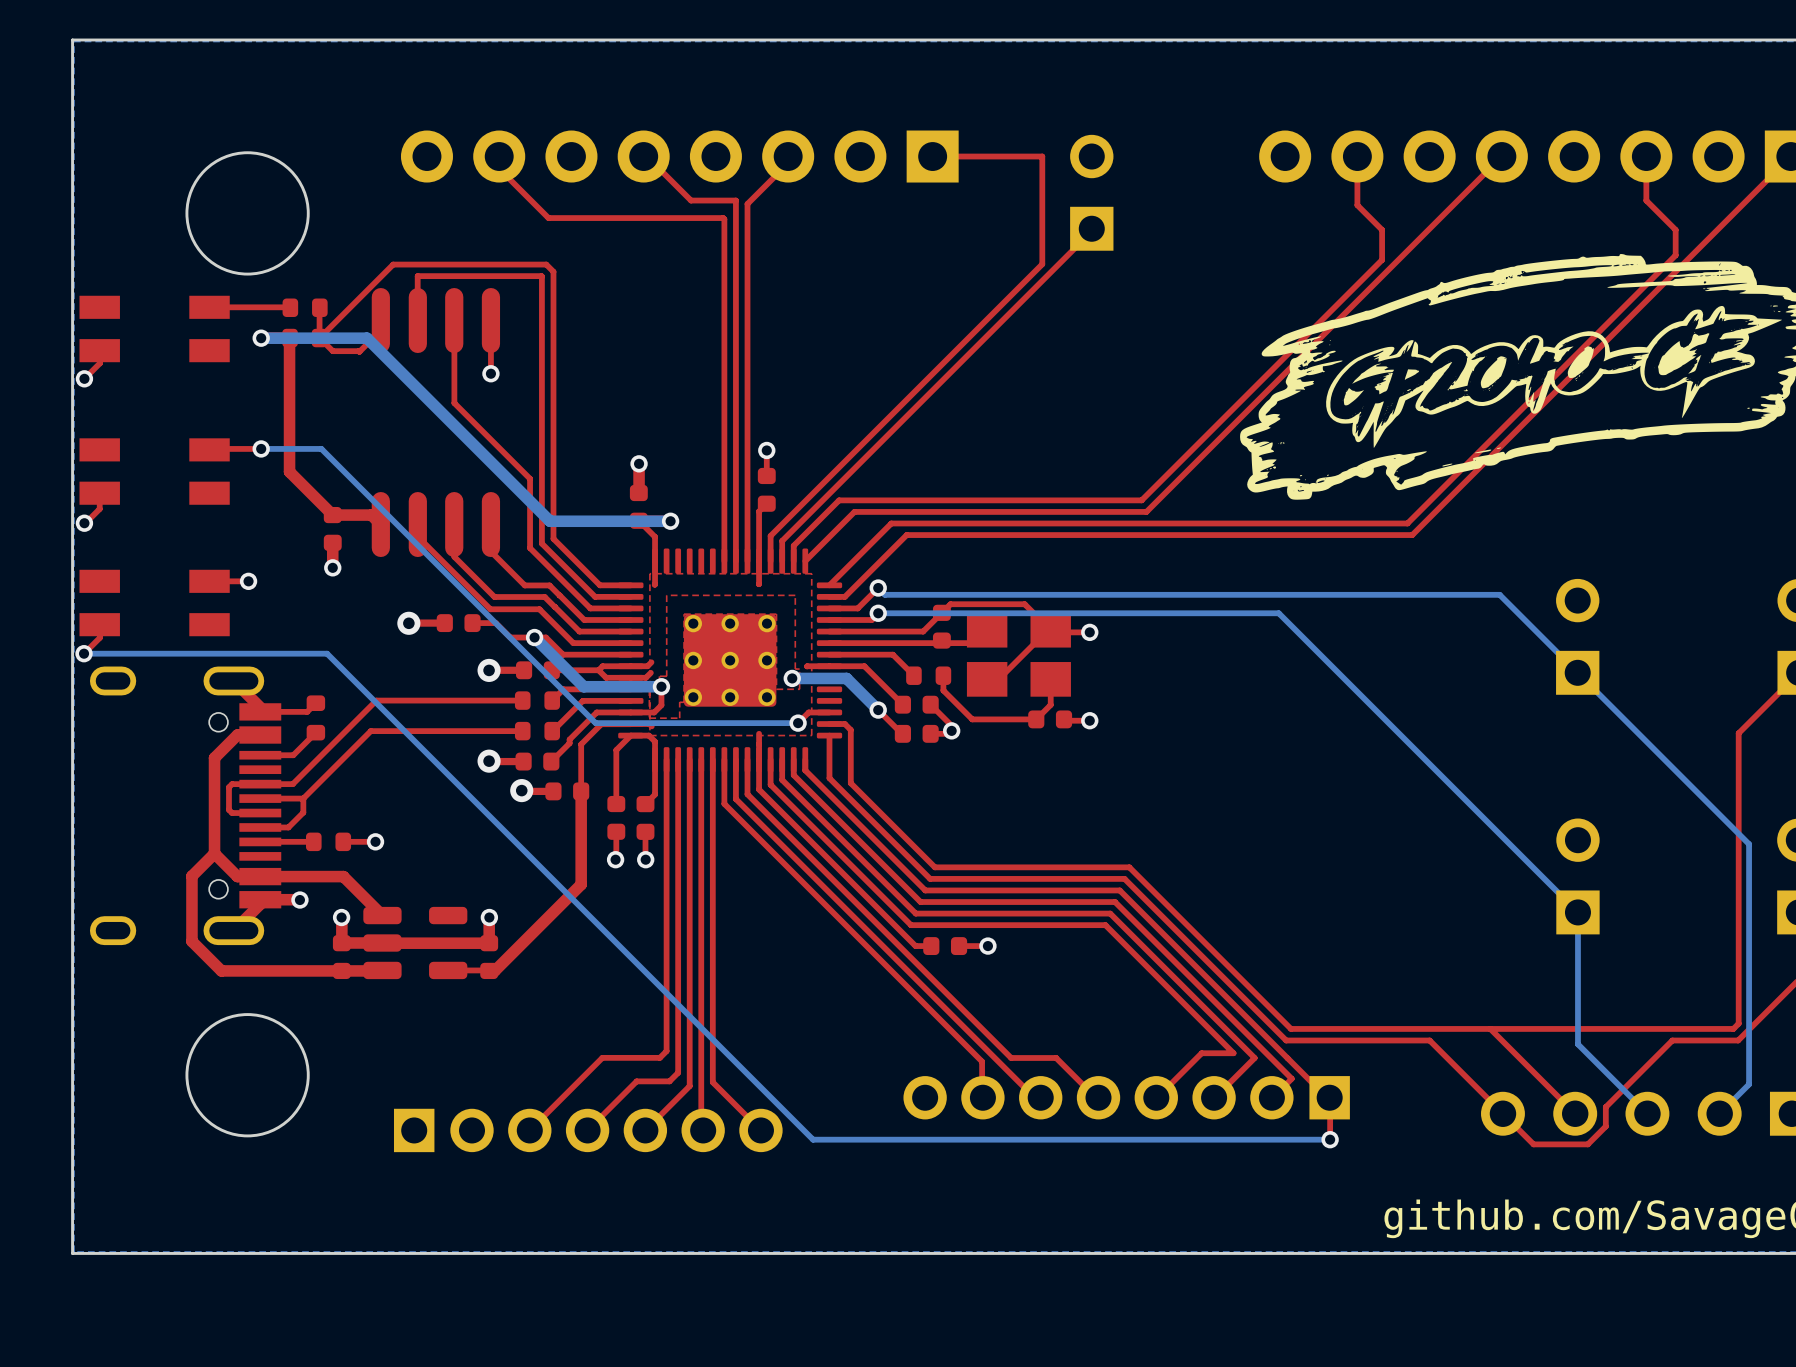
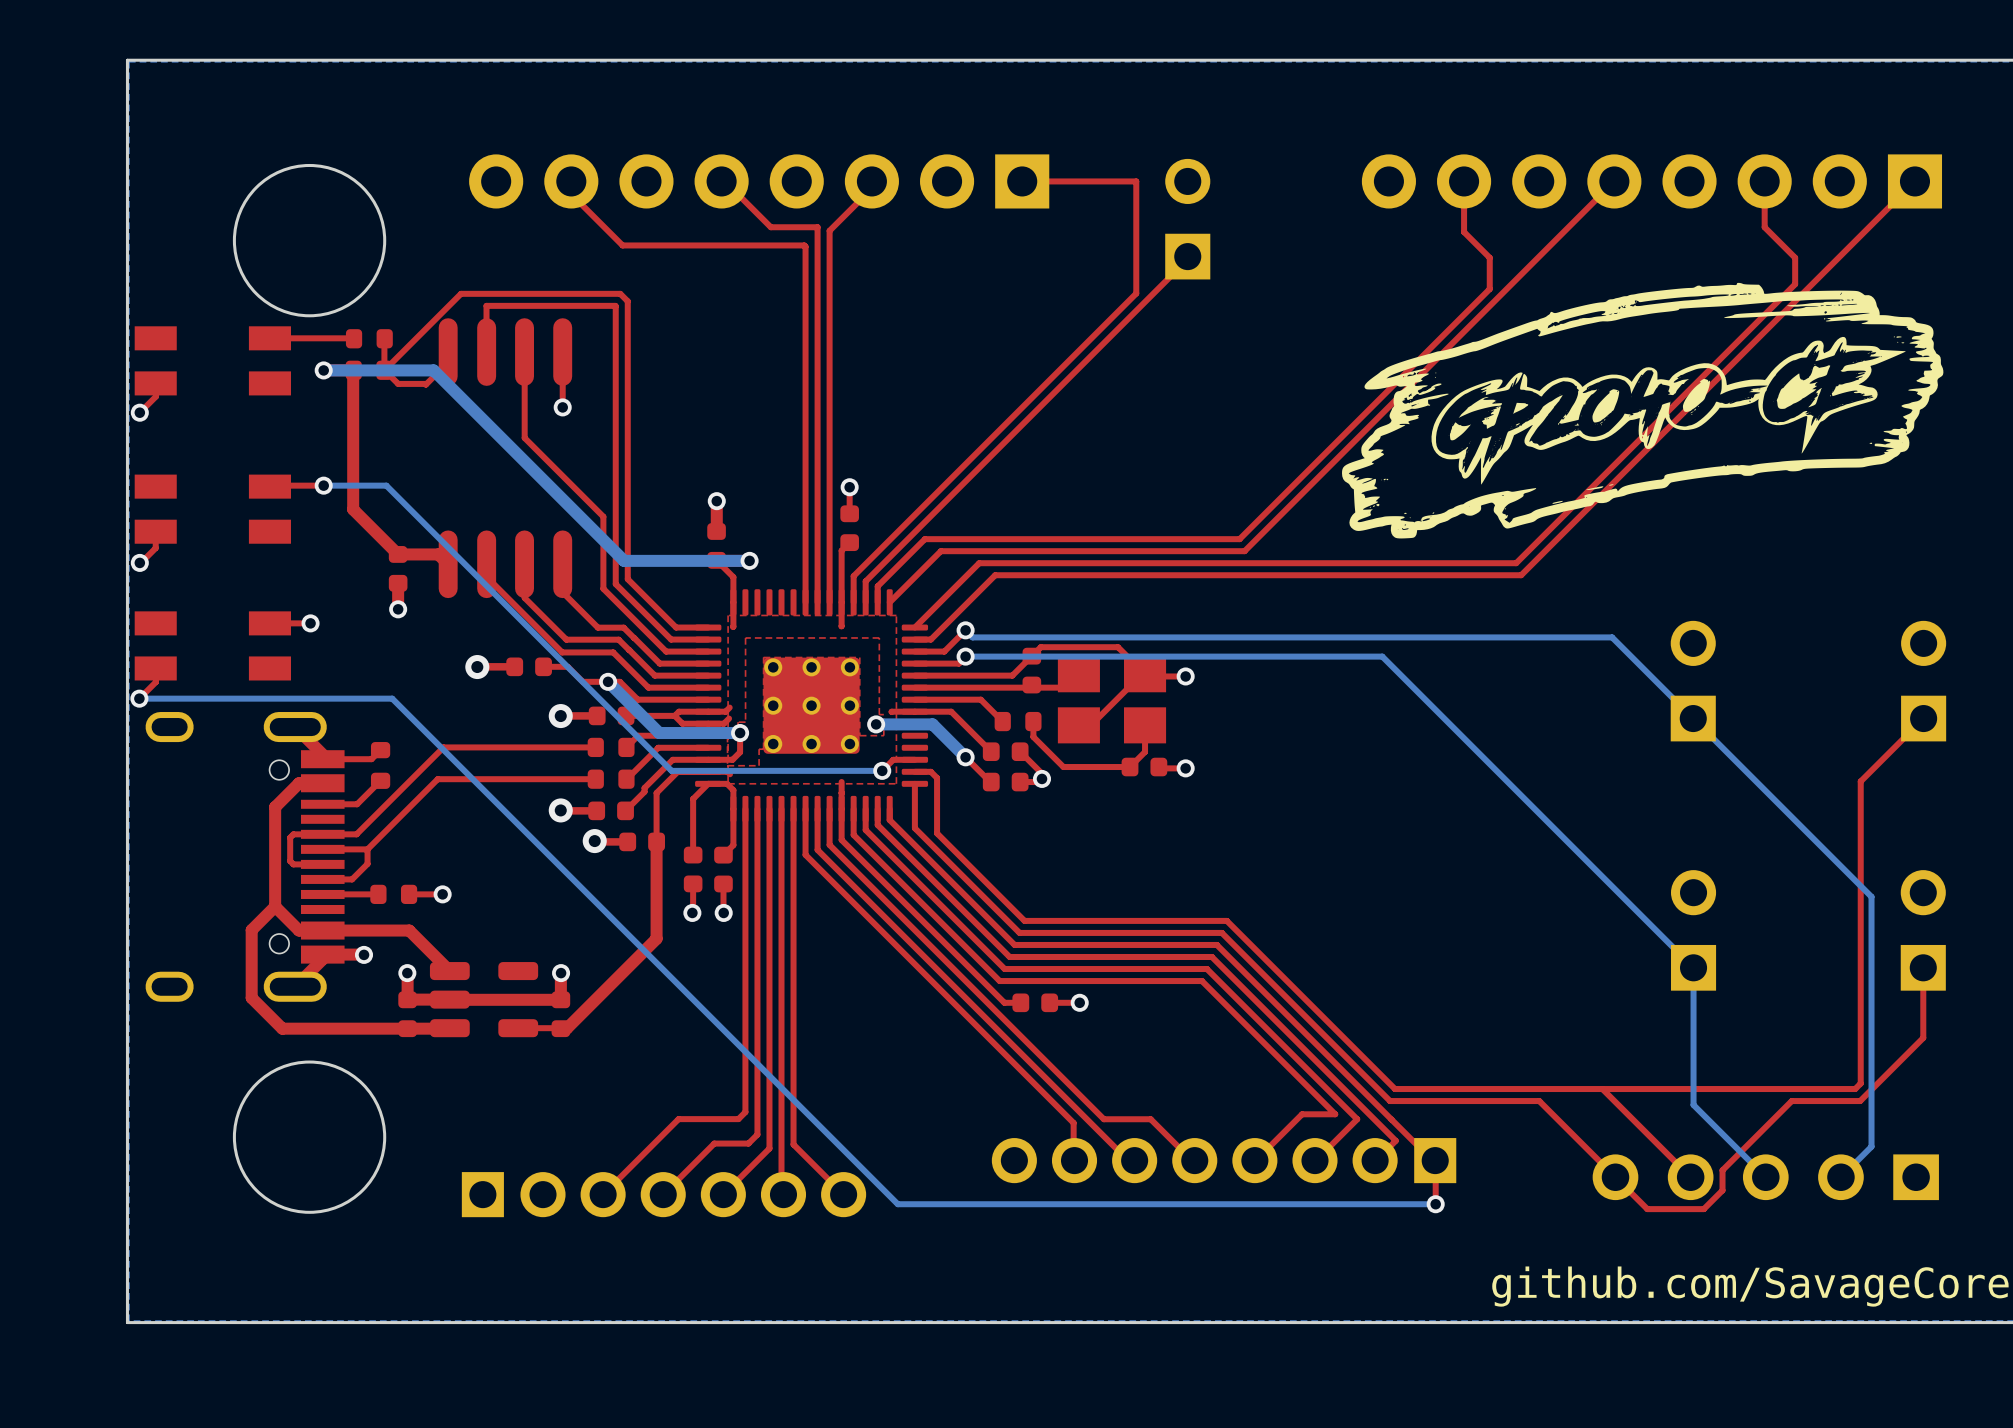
round board edge size: [185, 151, 310, 276] -> [232, 163, 387, 318]
round board edge size: [185, 1013, 310, 1138] -> [232, 1060, 387, 1214]

